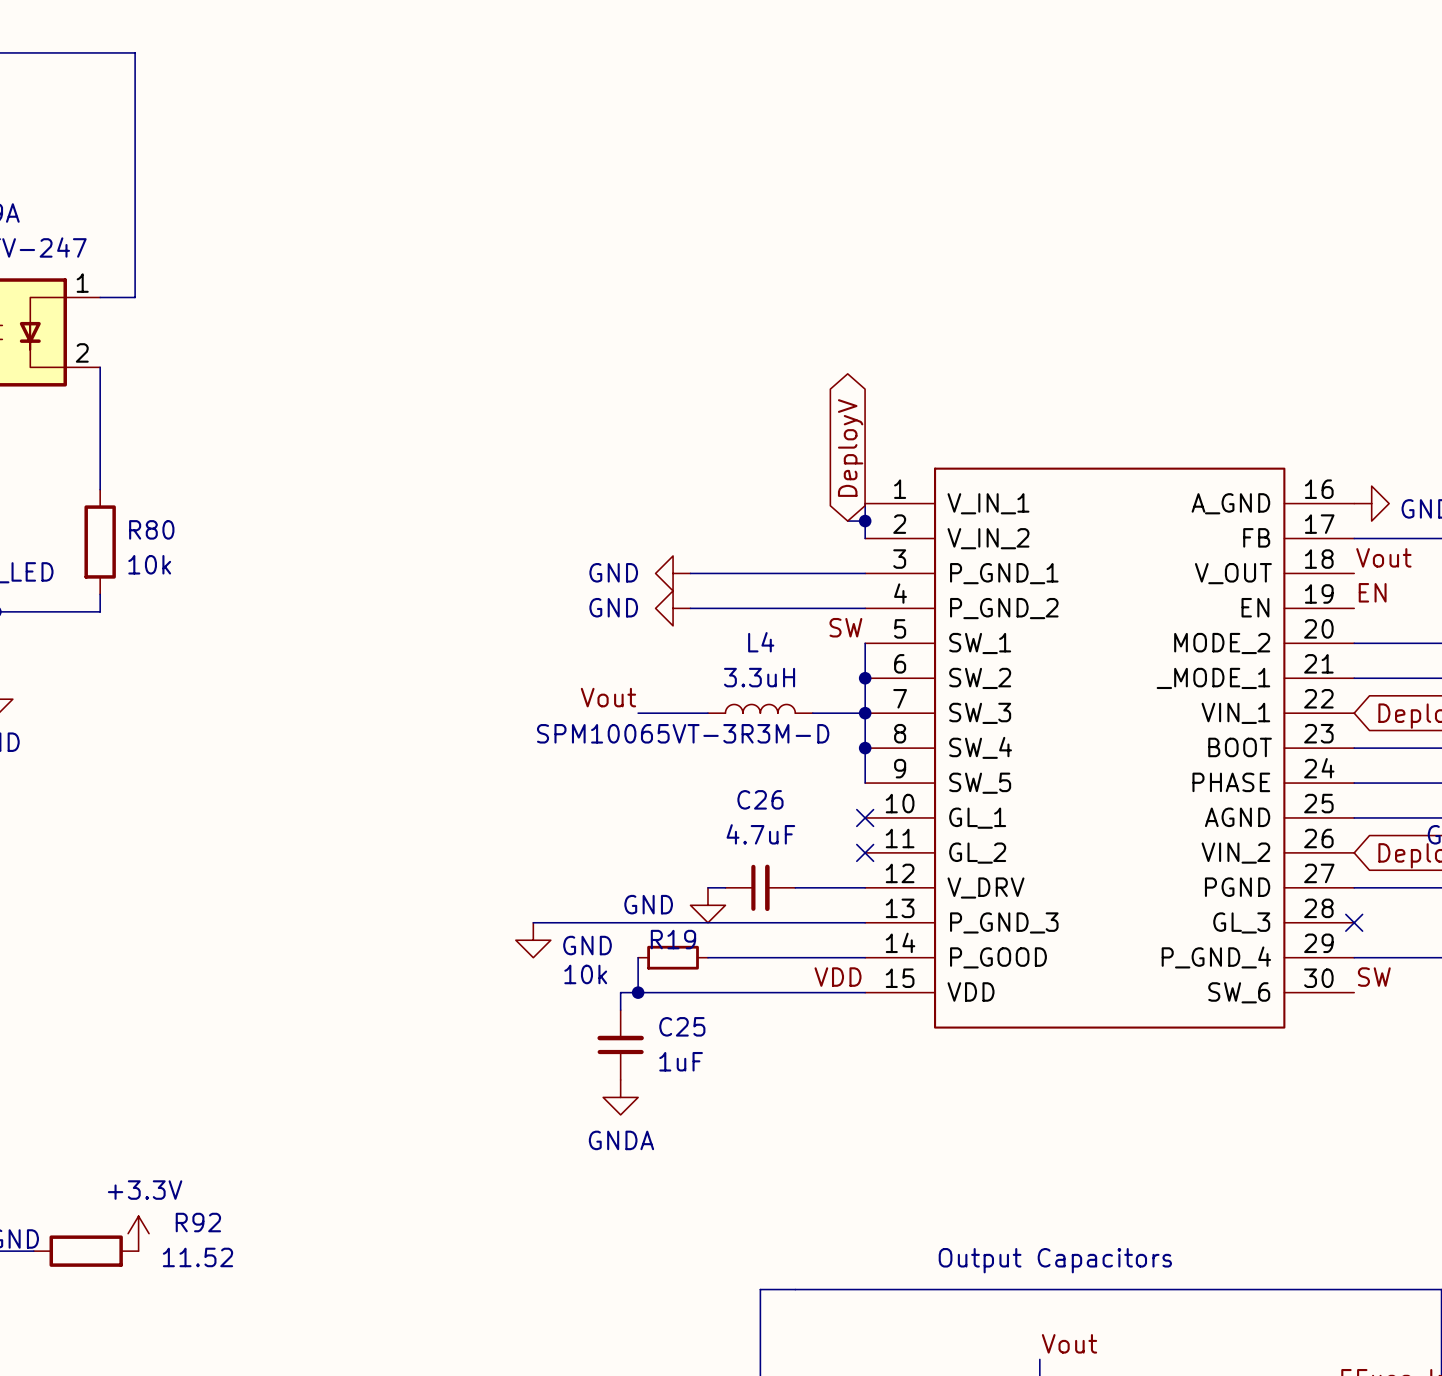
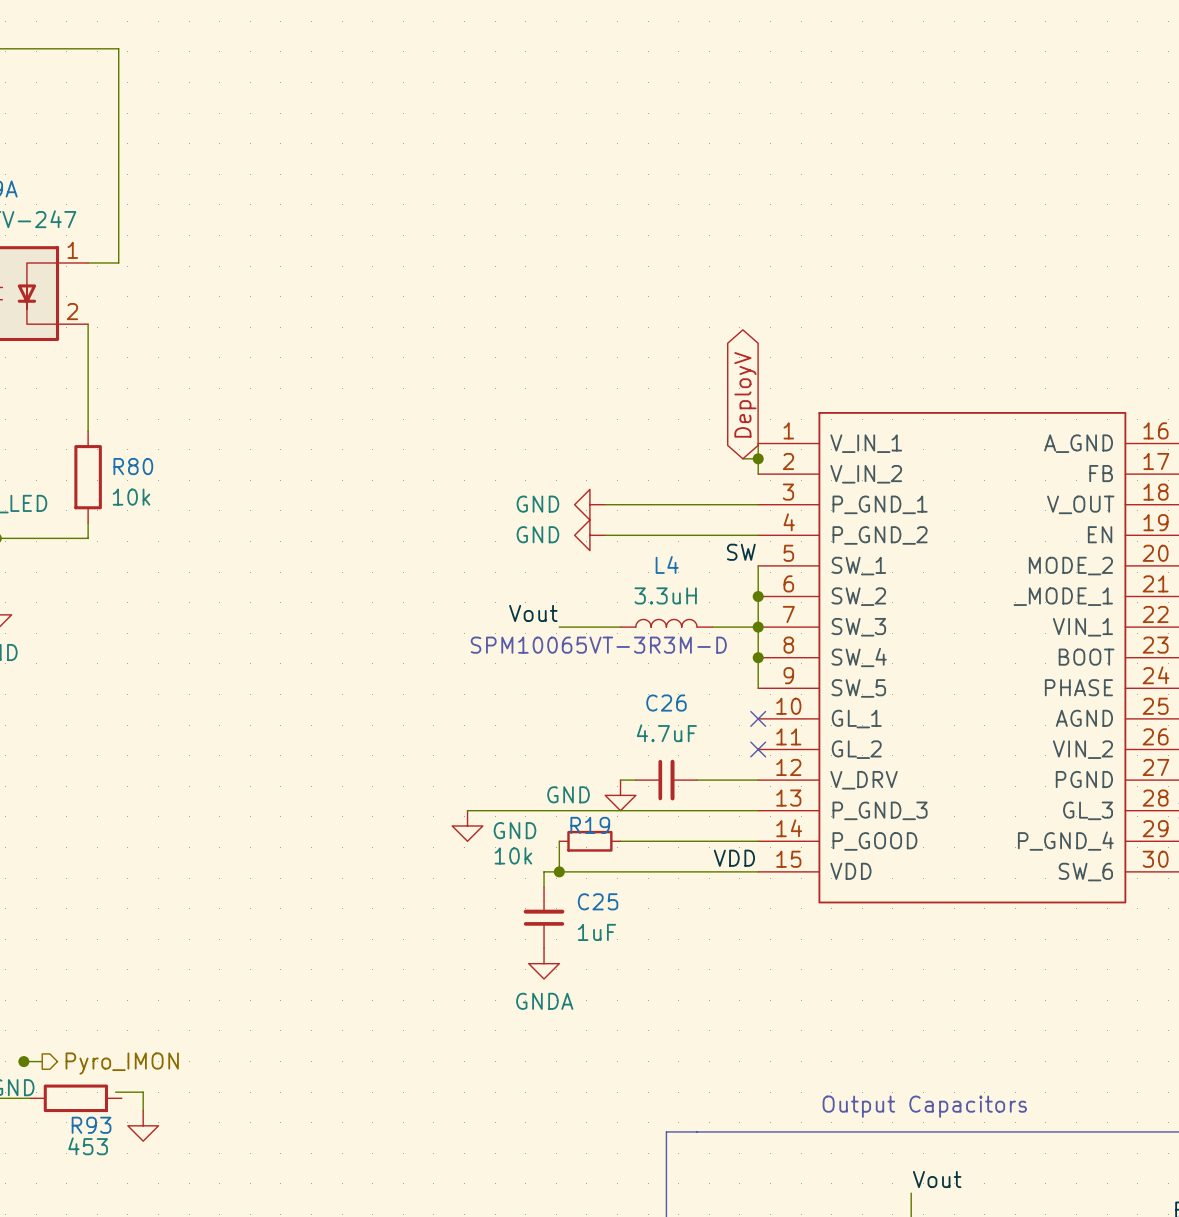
wire: none -> (23, 1061) (42, 1061)
junction: none -> (23, 1061)
hierarchical label: none -> Pyro_IMON (122, 1063)
R92 name: R92 (198, 1222) -> R93 (91, 1125)
power symbol: +3.3V (138, 1233) -> none
wire: none -> (115, 1092) (143, 1092) (143, 1110)
R92 value: 11.52 (197, 1257) -> 453 (88, 1146)
power symbol: none -> (143, 1125)

